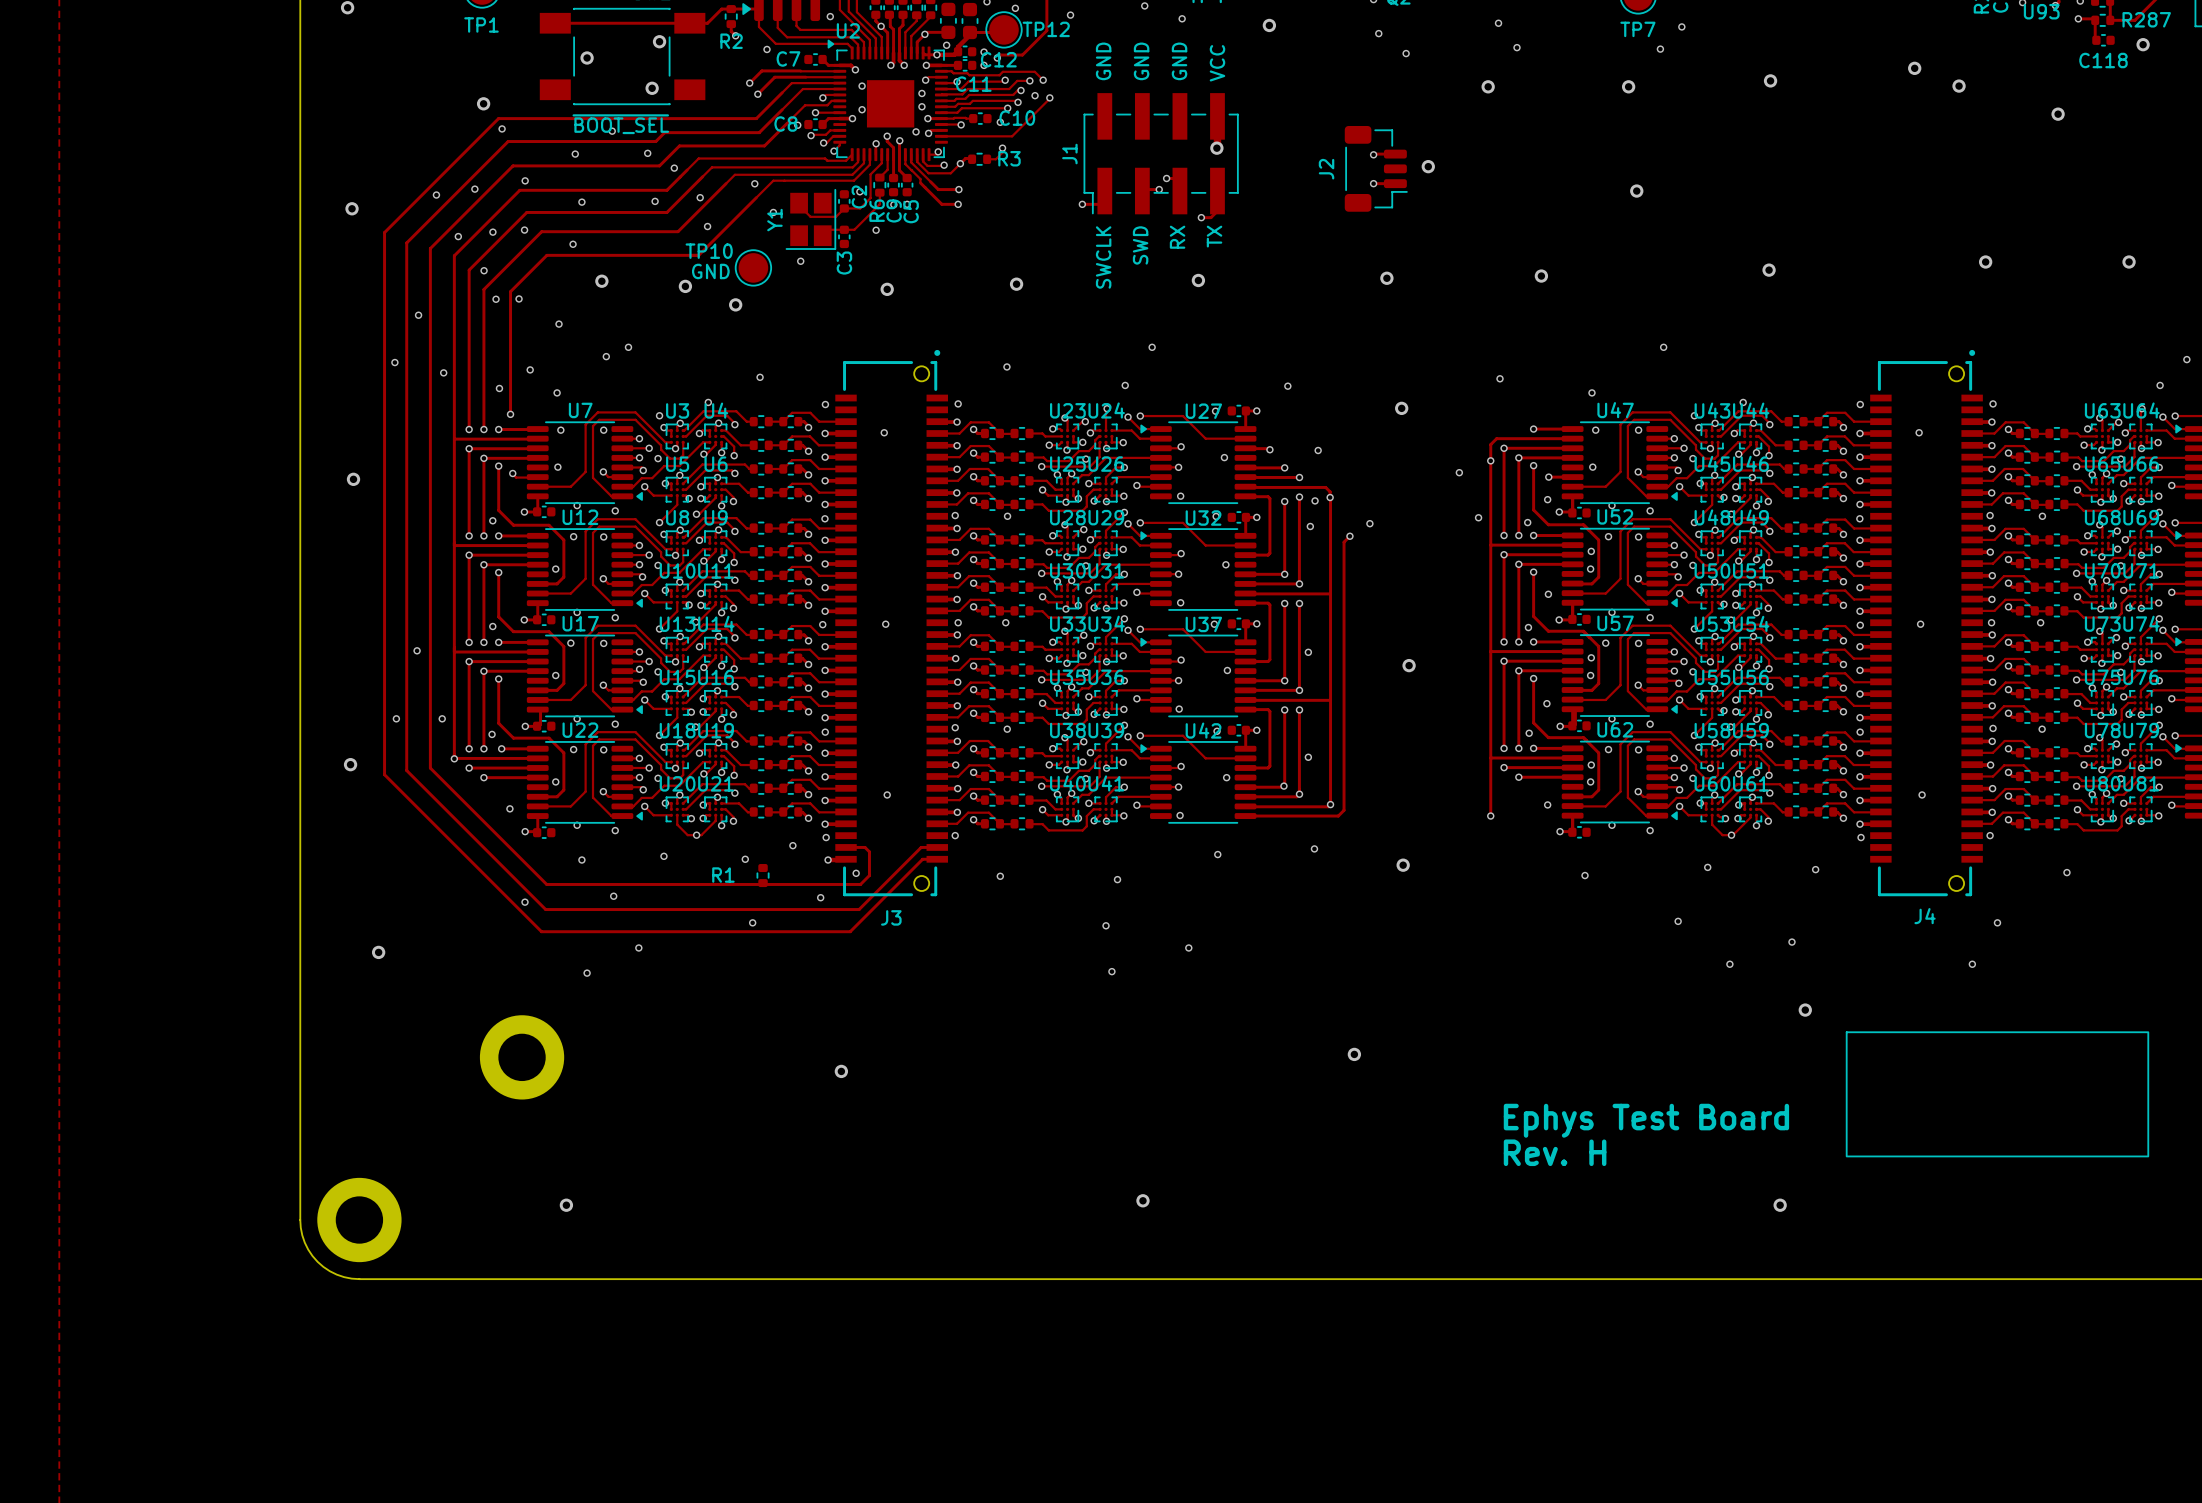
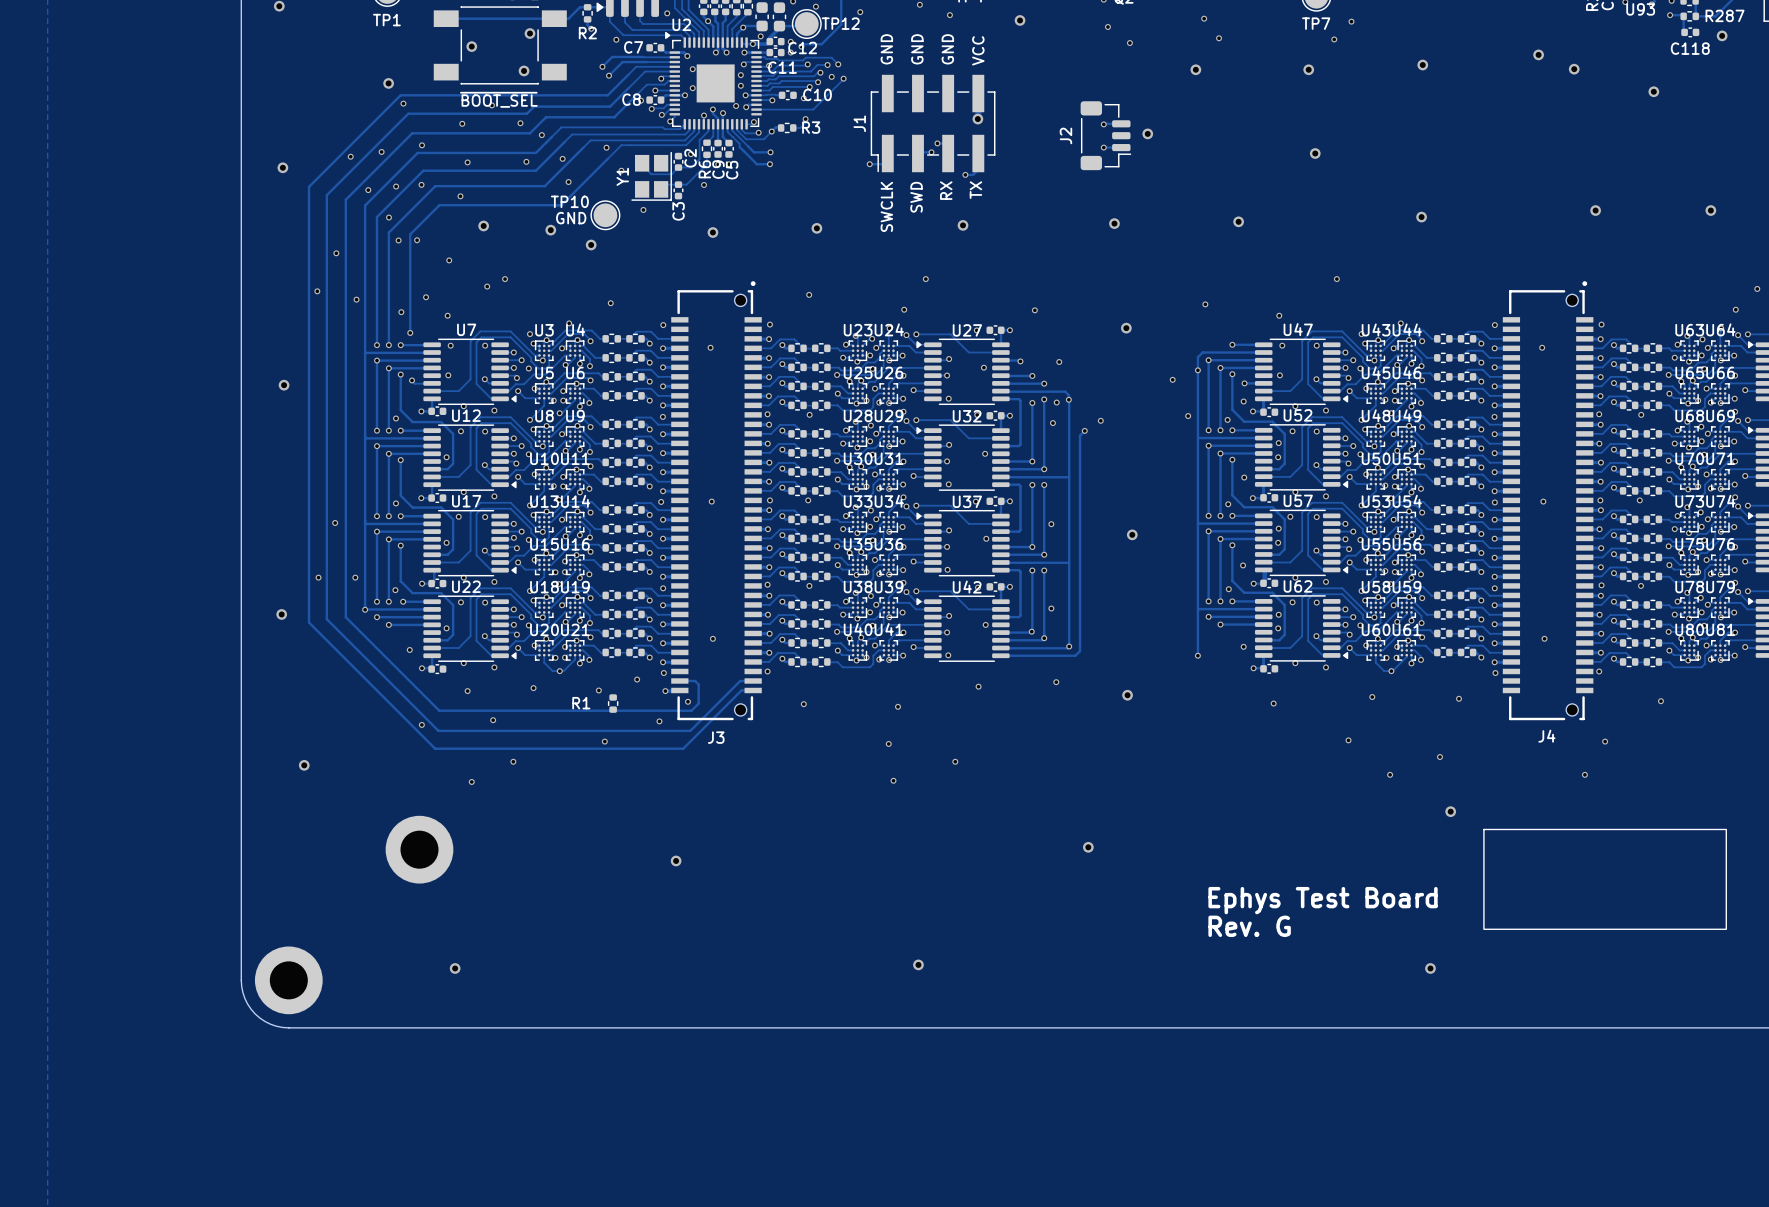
text: Rev. H (1555, 1152) -> Rev. G (1249, 926)

